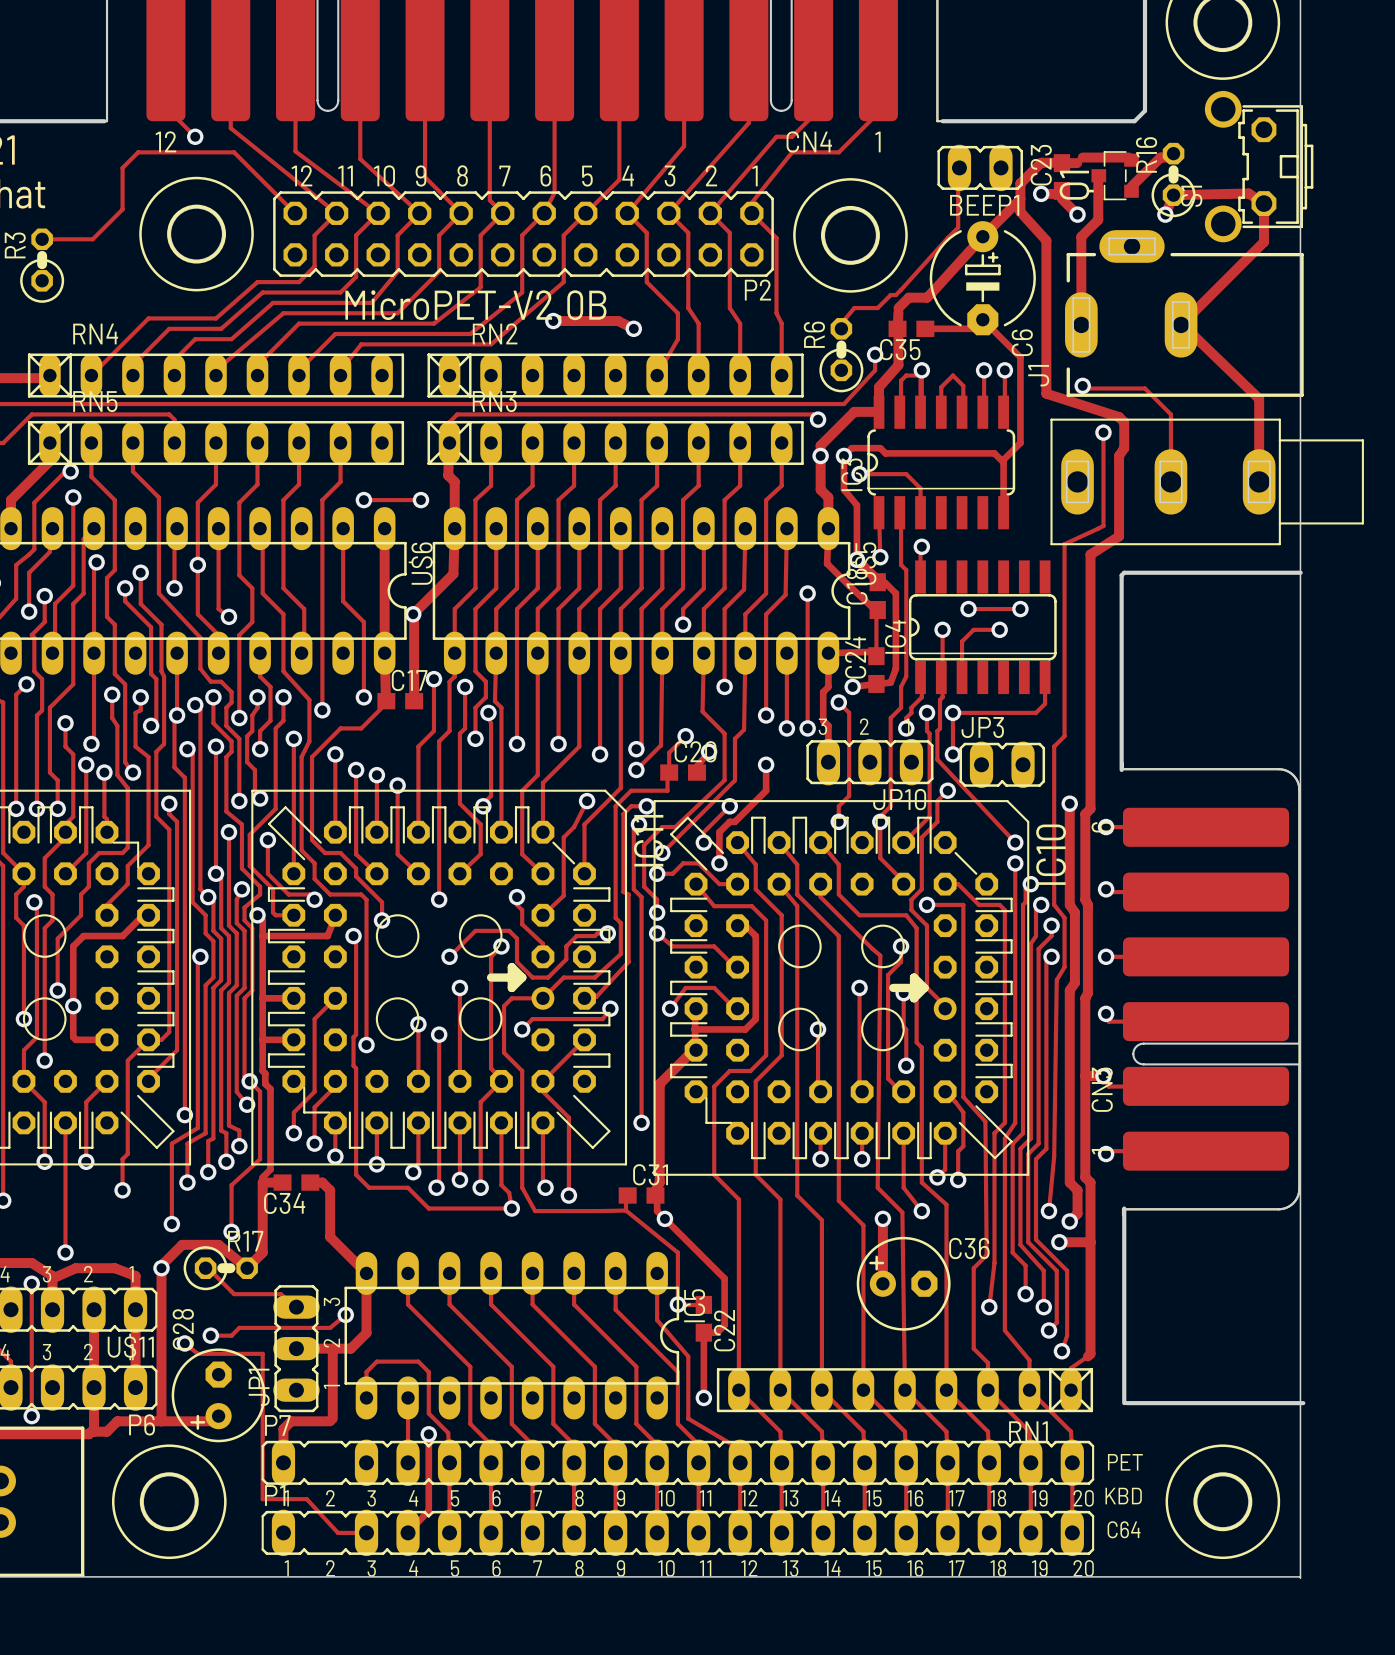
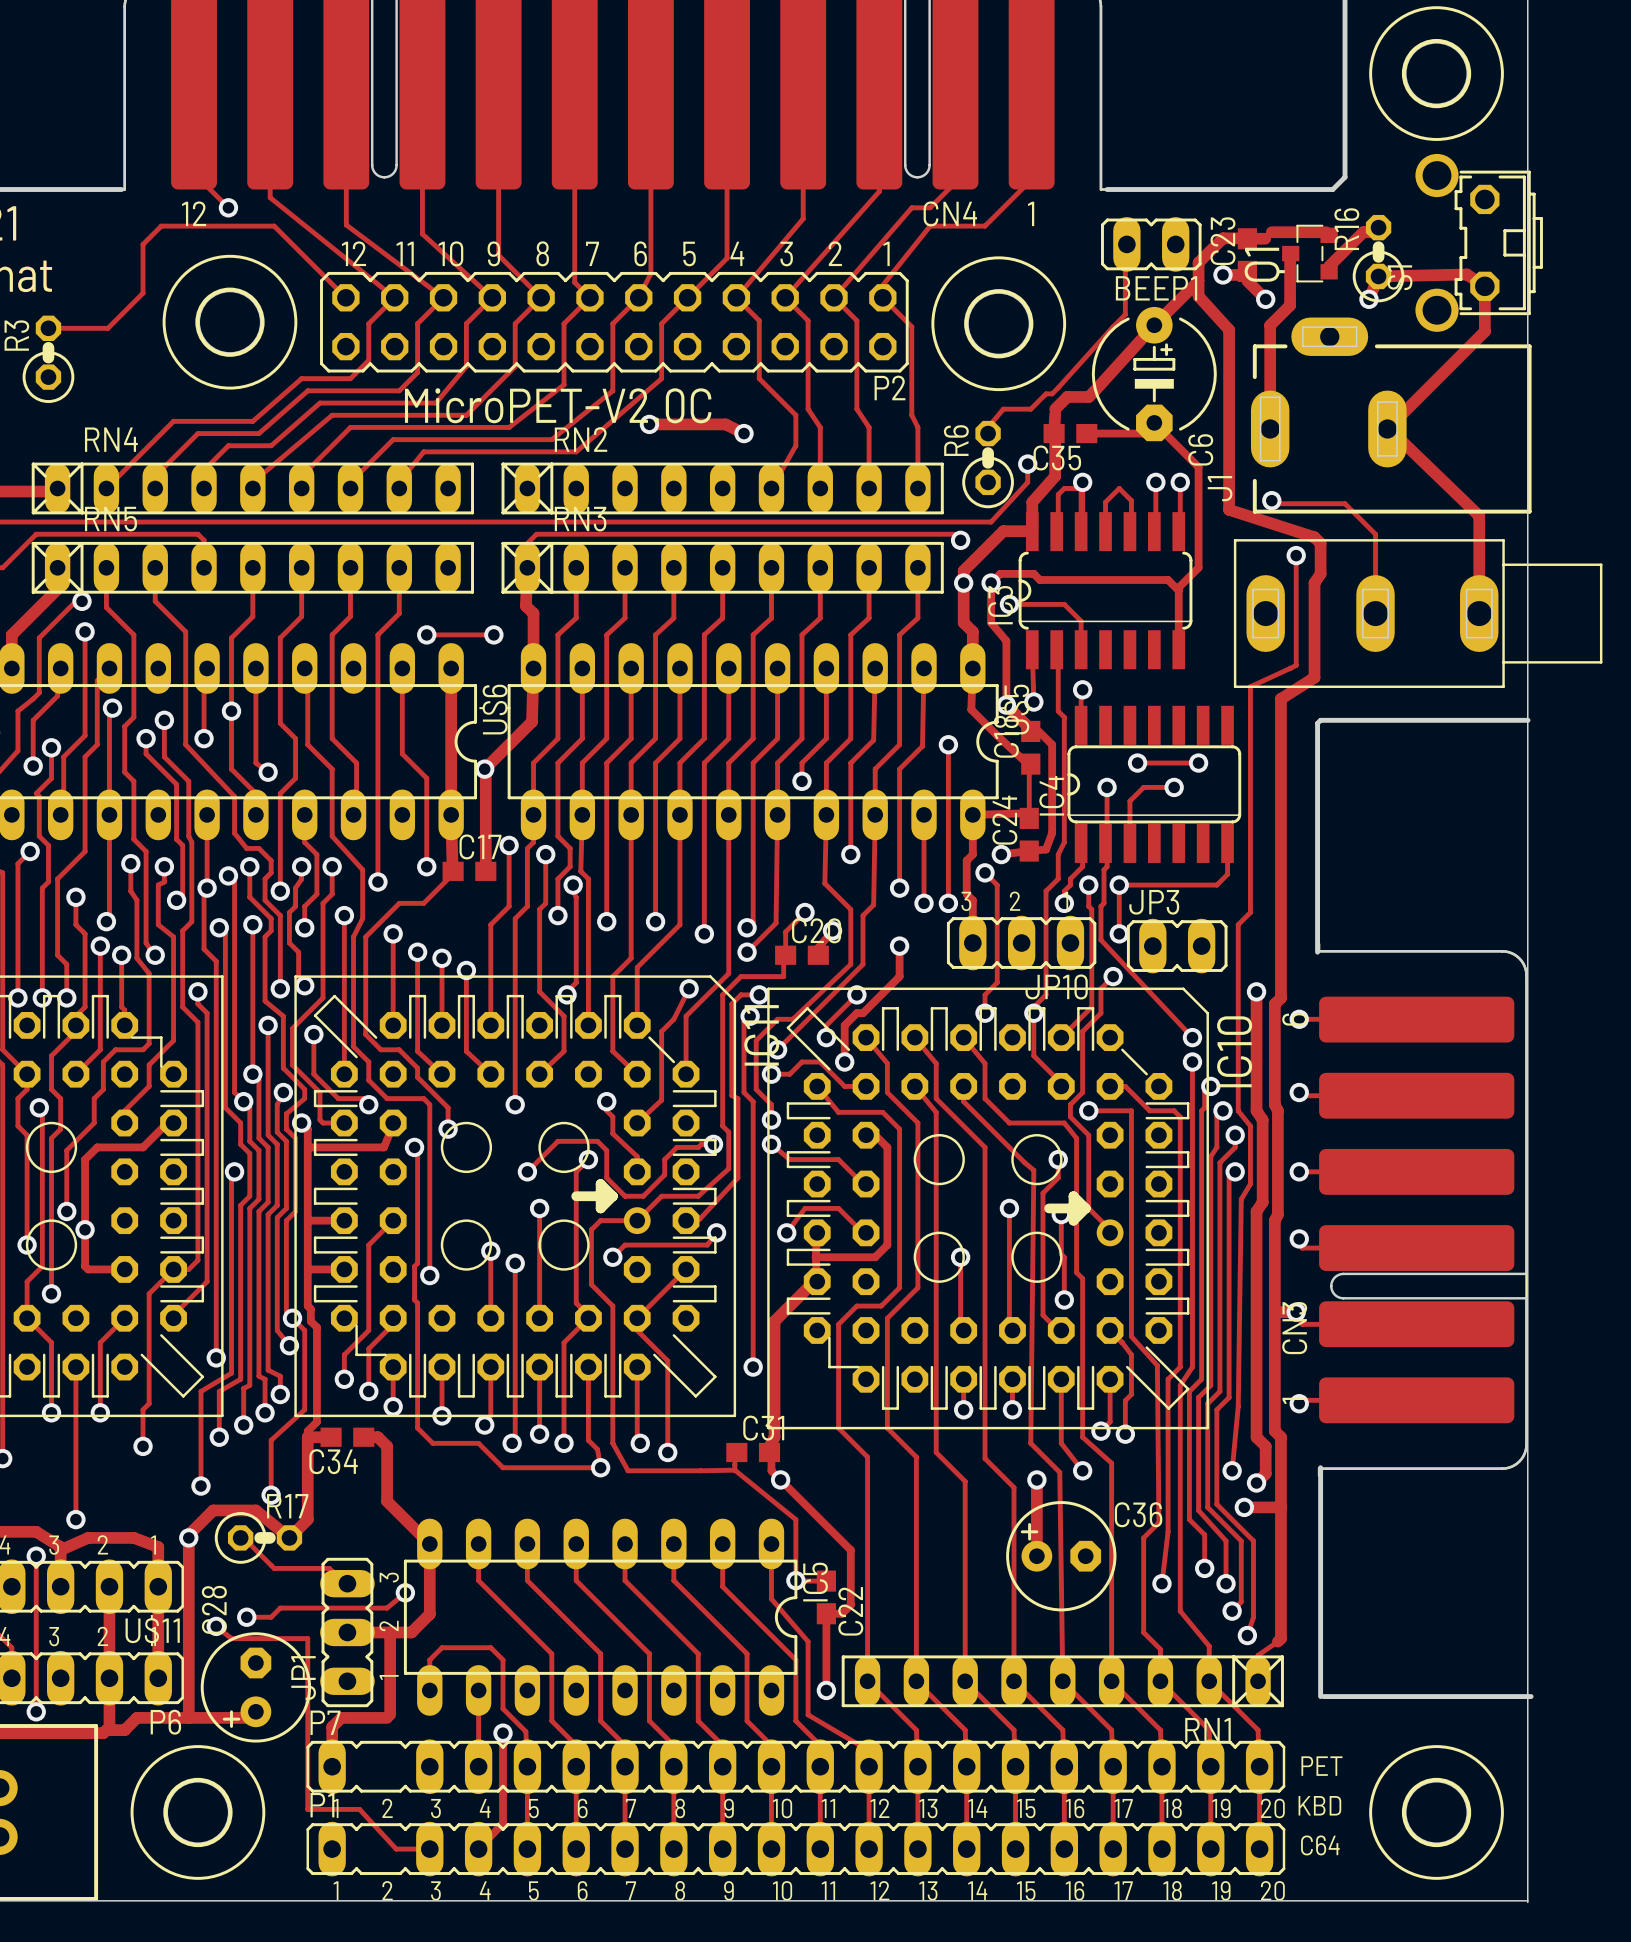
text: MicroPET-V2.0B (475, 305) -> MicroPET-V2.0C (558, 405)

